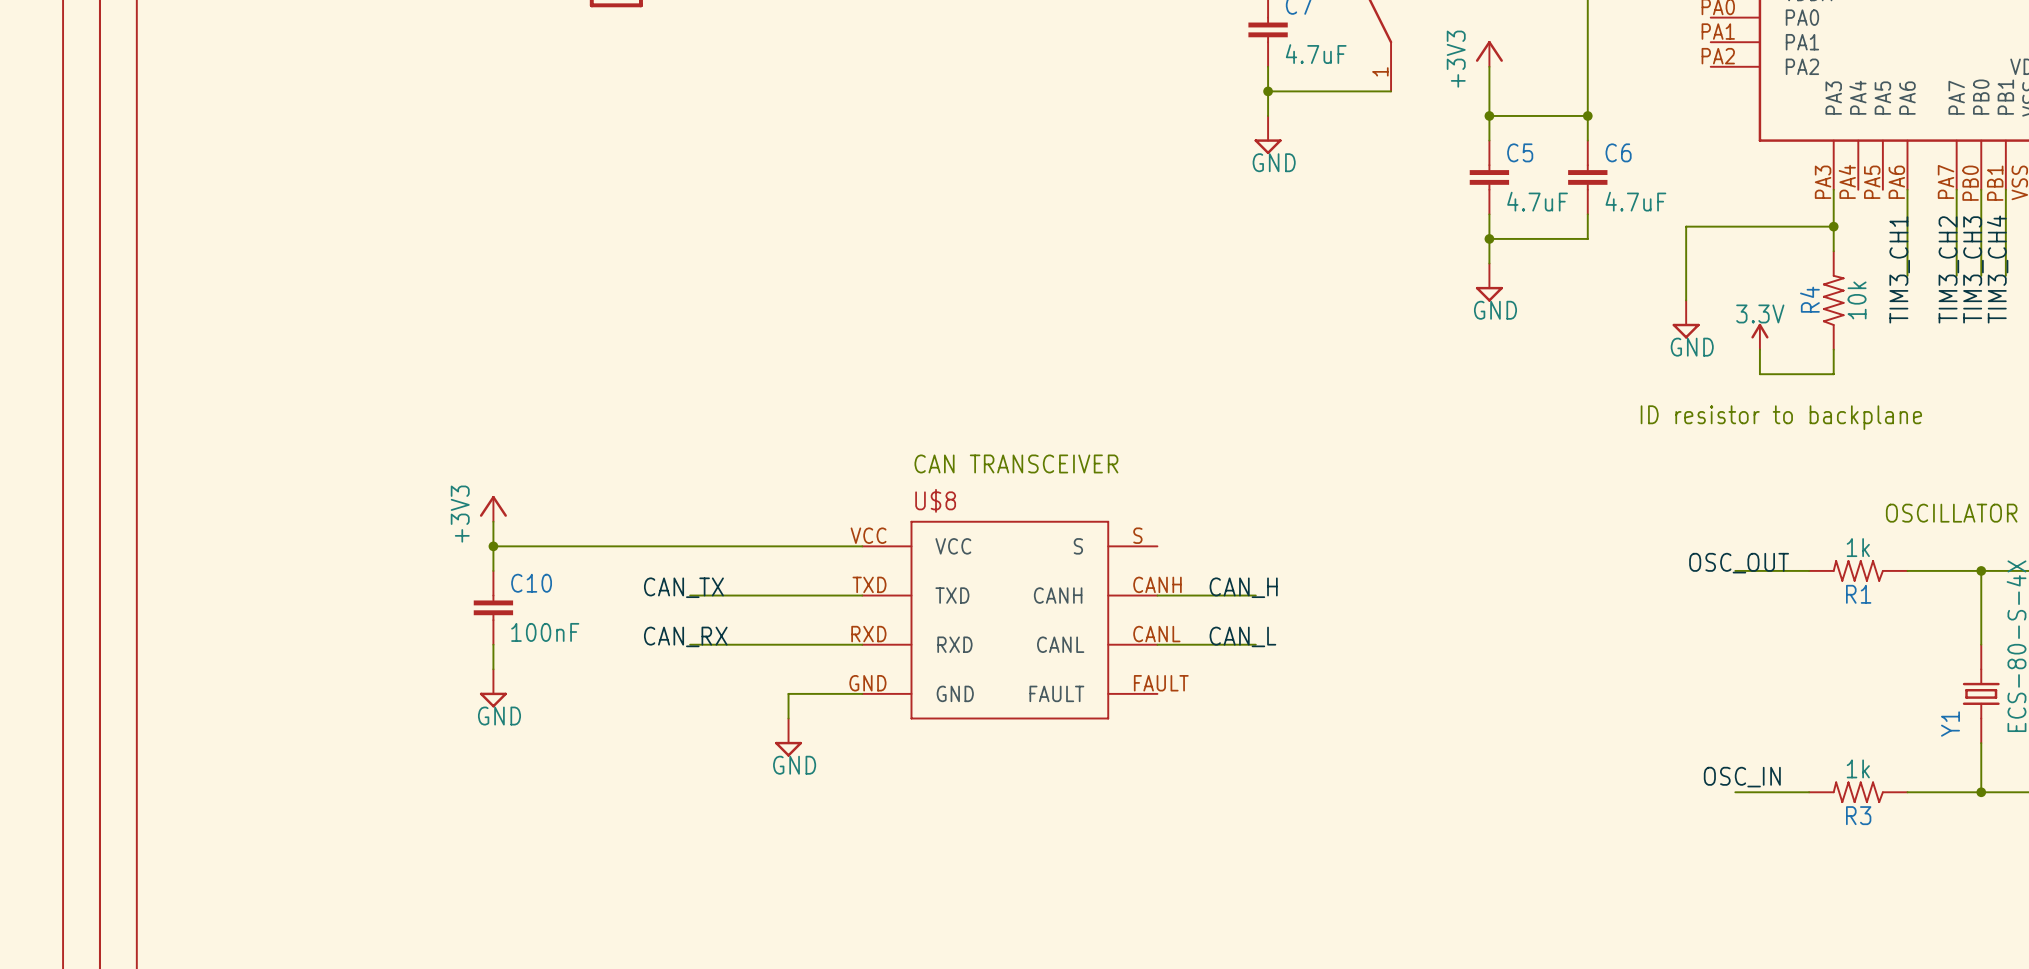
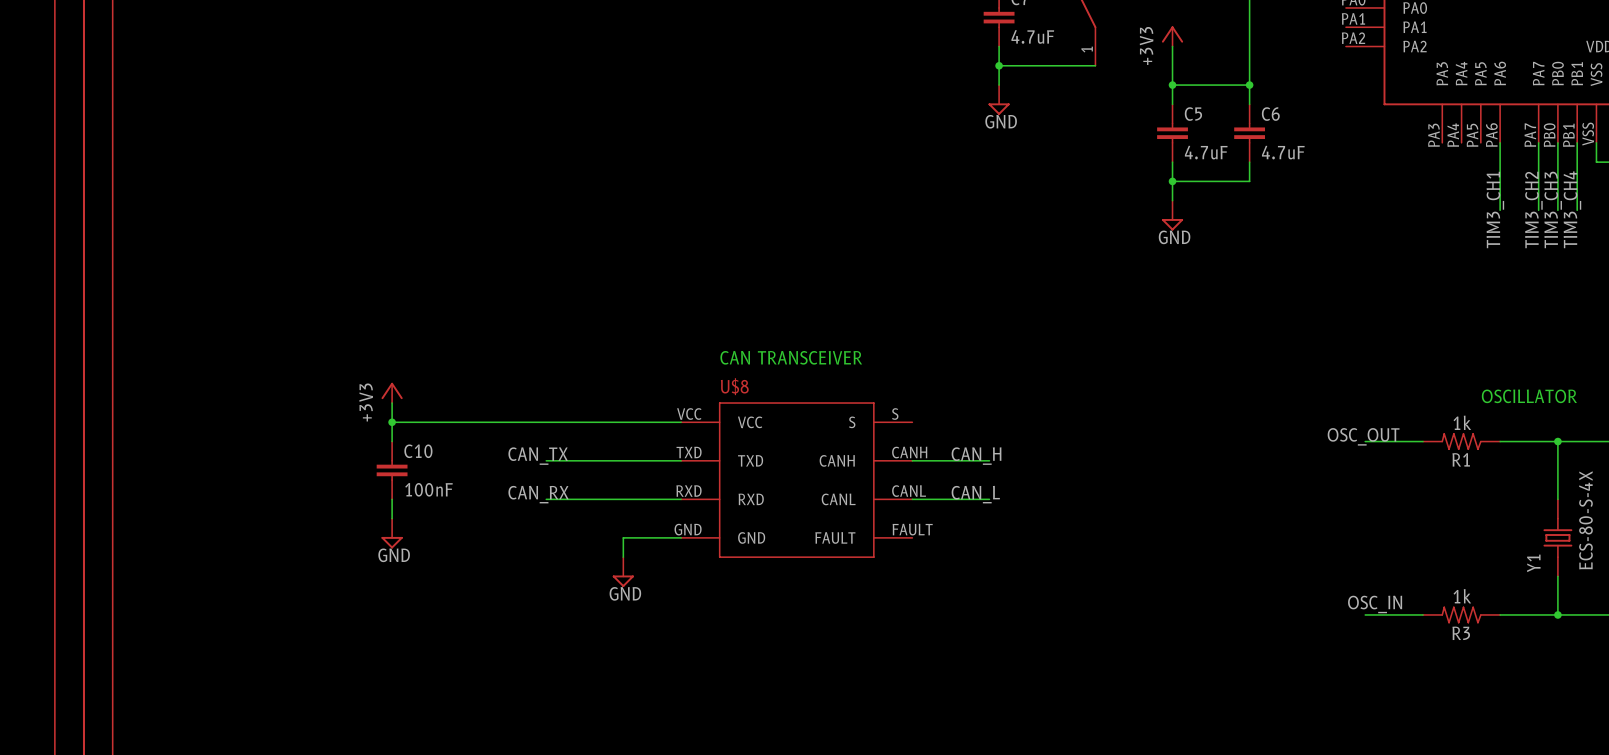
wire: (1833, 189) (1833, 251) -> none
wire: (1833, 226) (1686, 226) (1686, 300) -> none
junction: (1833, 226) -> none
R4: 10k (1833, 300) -> none
power symbol: GND (1686, 319) -> none
power symbol: 3.3V (1759, 336) -> none
wire: (1759, 349) (1759, 374) (1833, 374) (1833, 349) -> none
text: ID resistor to backplane (1781, 417) -> none

